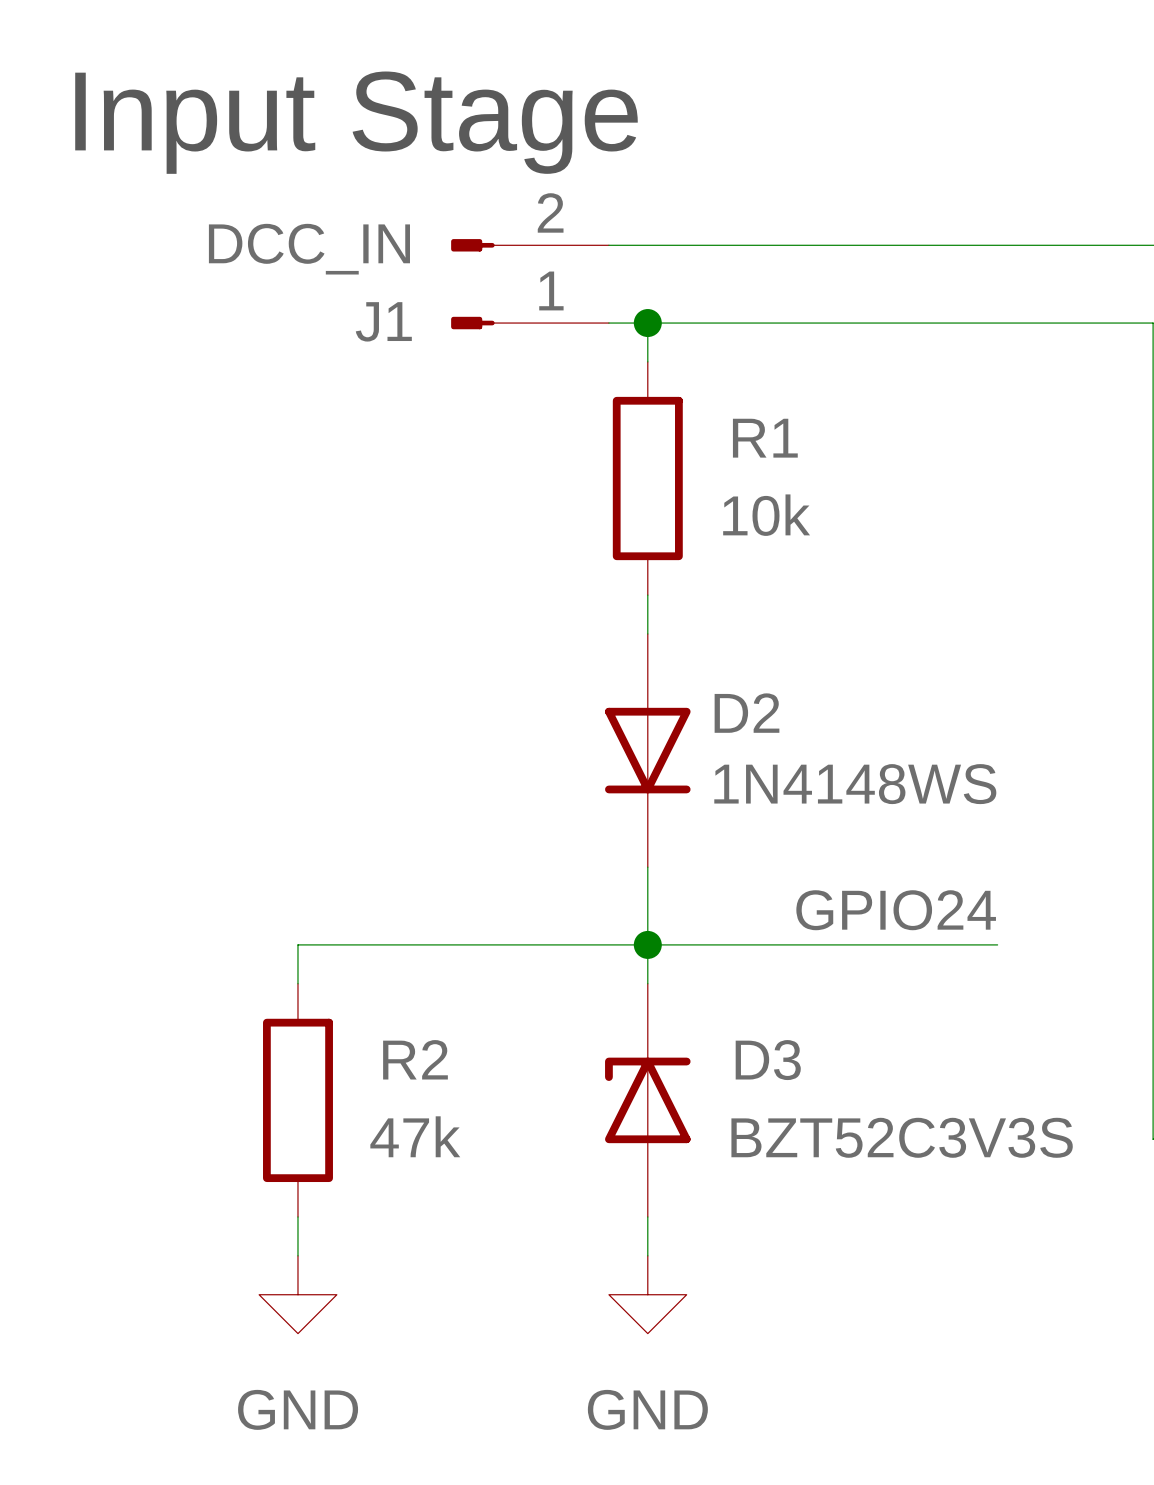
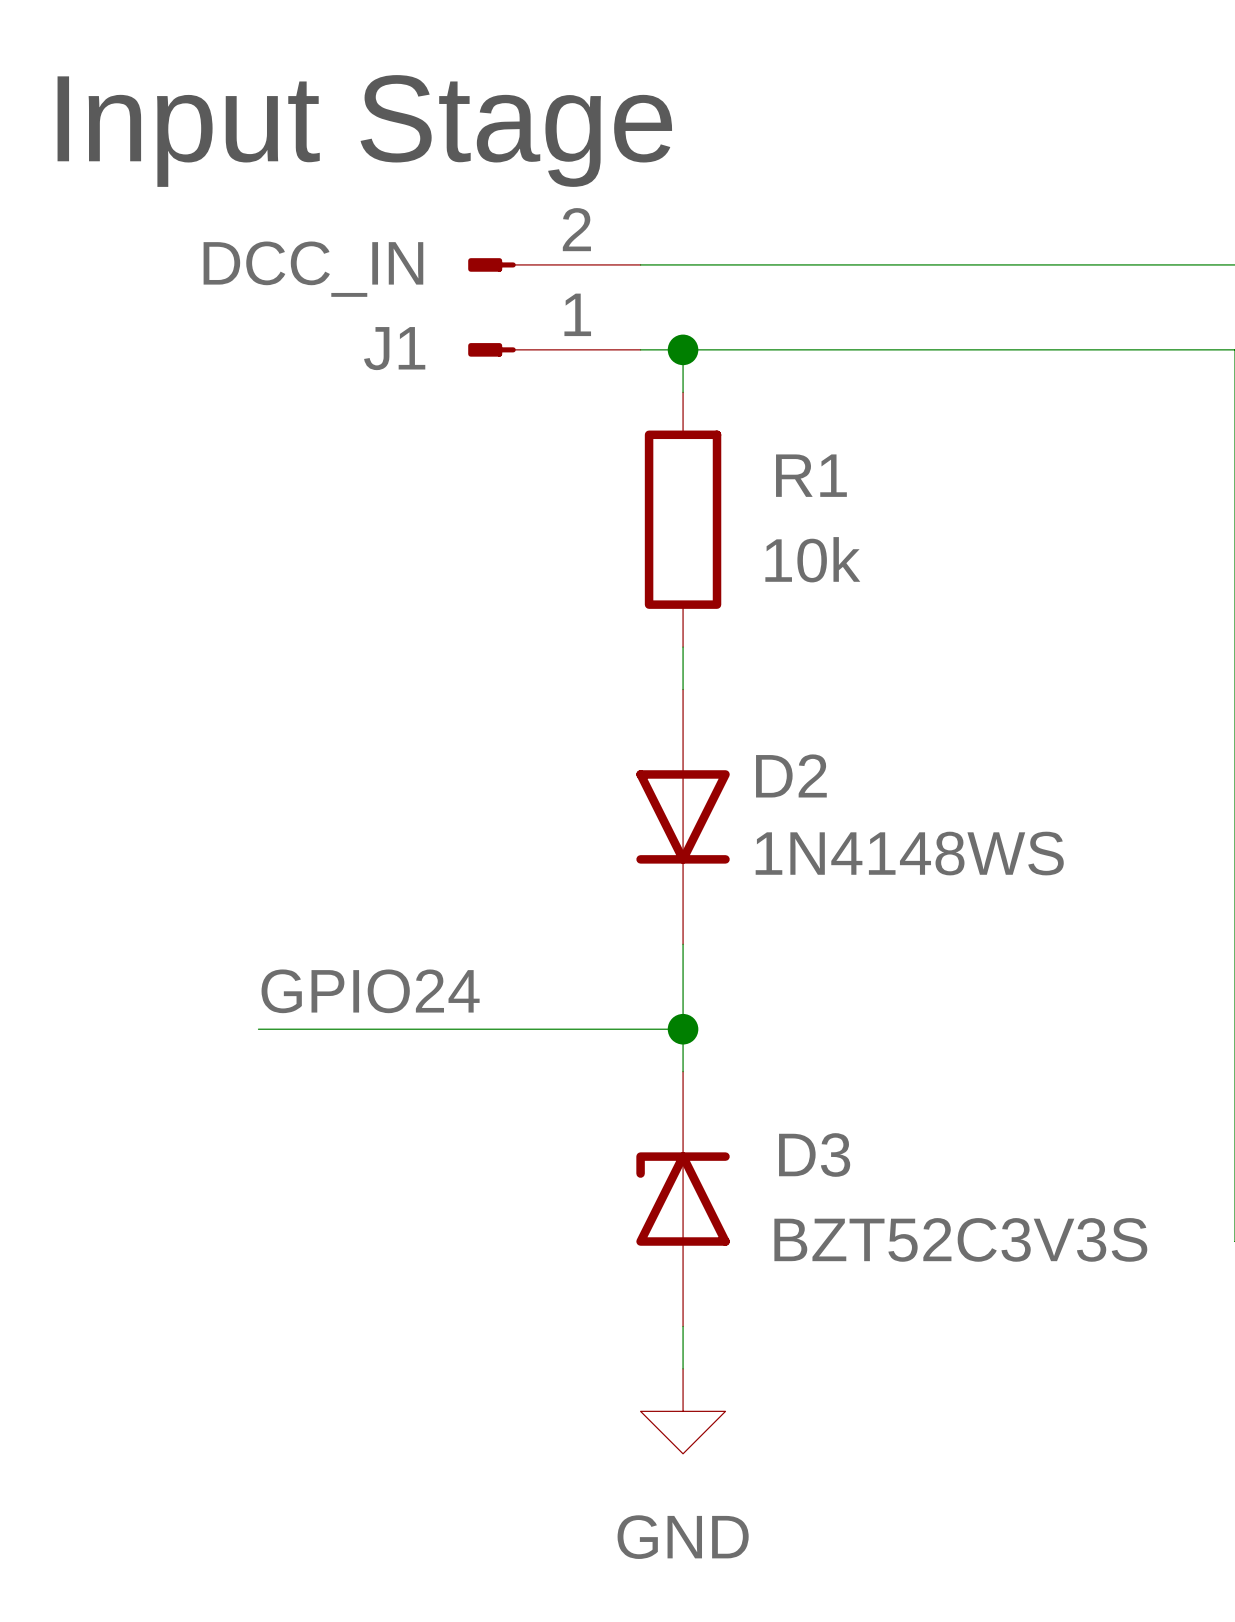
label position: GPIO24 (896, 910) -> GPIO24 (370, 991)
wire: (297, 944) (297, 983) -> (300, 1029) (258, 1029)
wire: (647, 944) (997, 944) -> none
R2: 47k (297, 1100) -> none
wire: (297, 1217) (297, 1255) -> none
power symbol: GND (297, 1294) -> none

